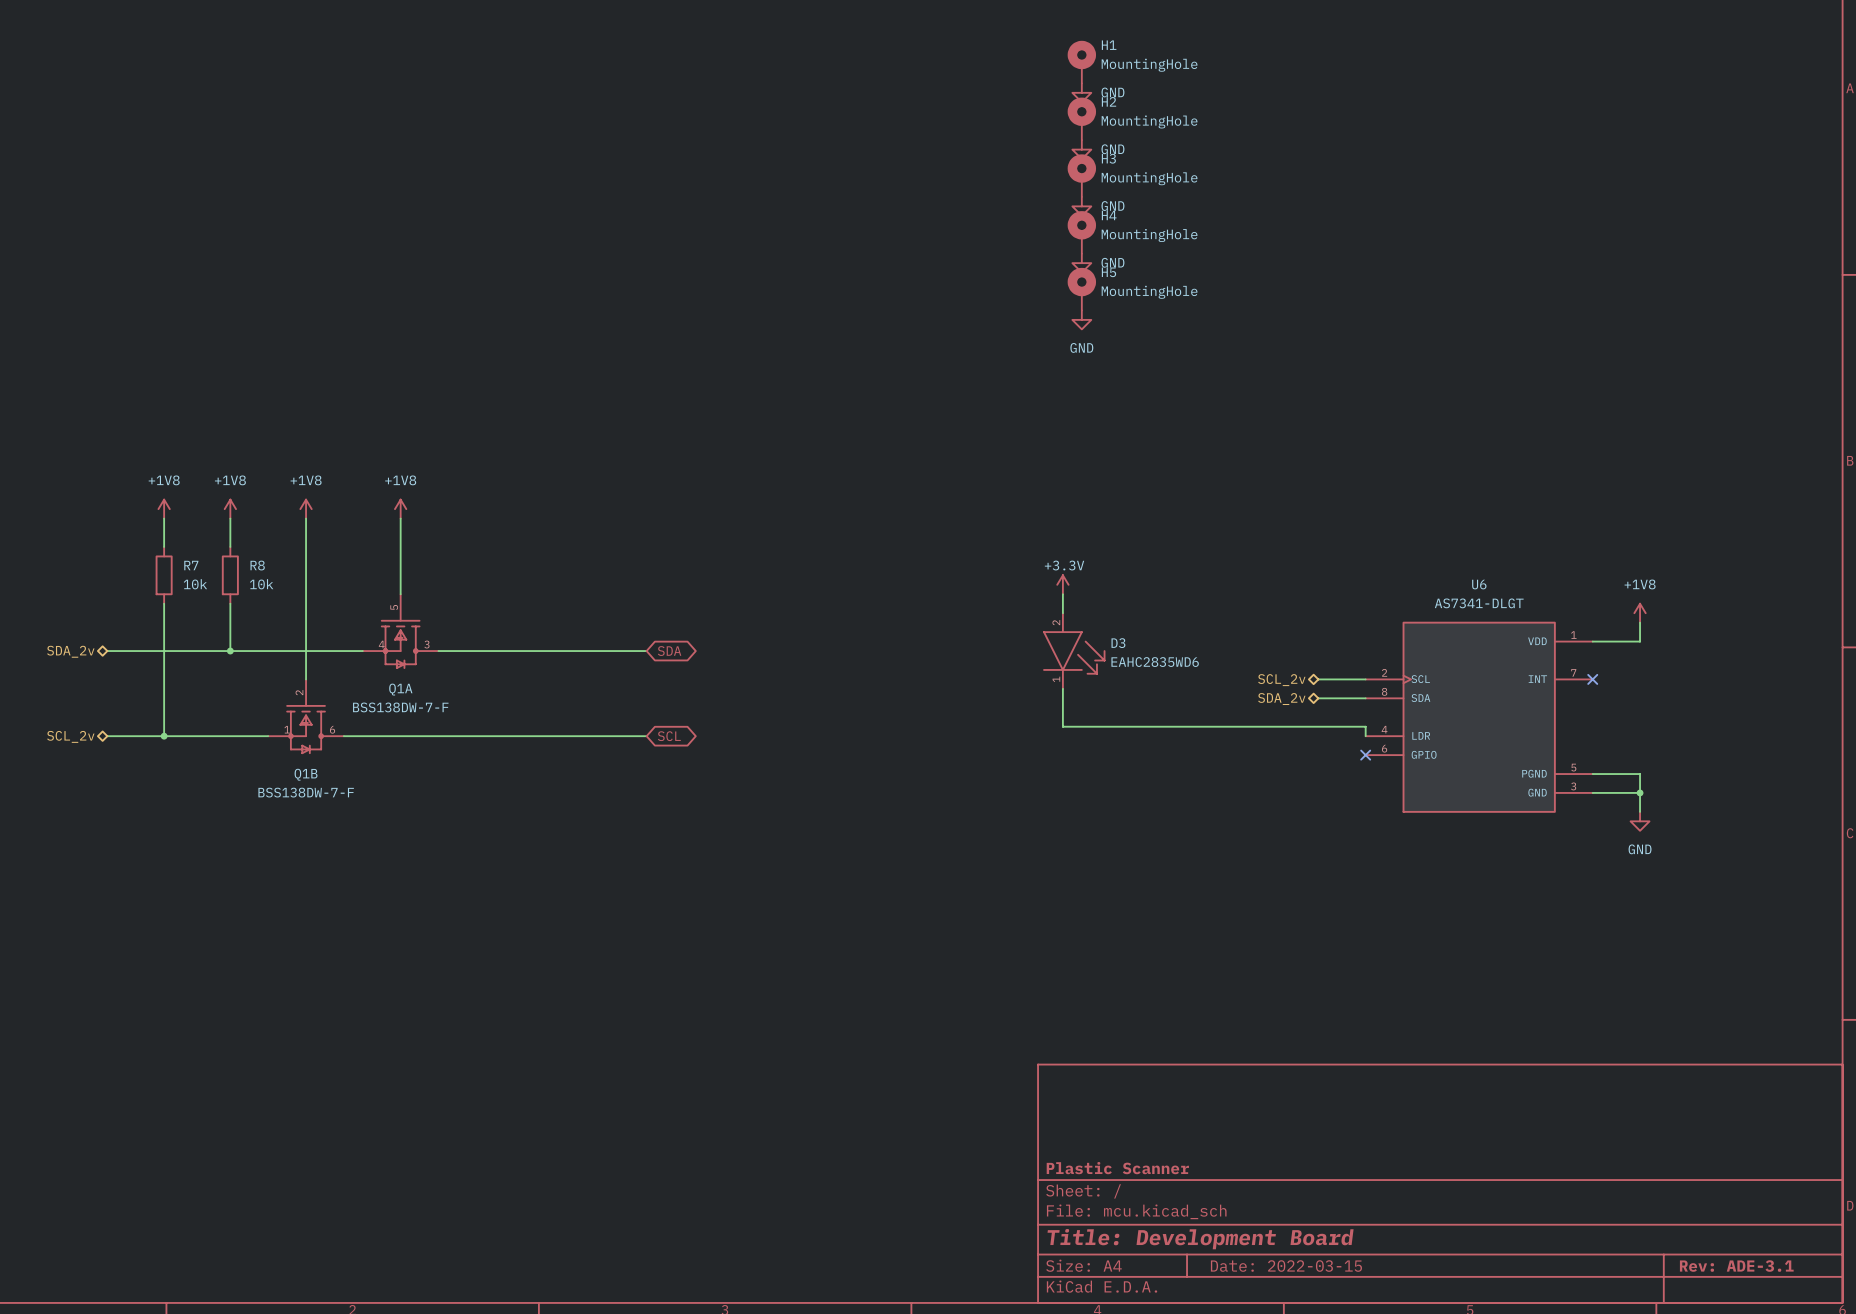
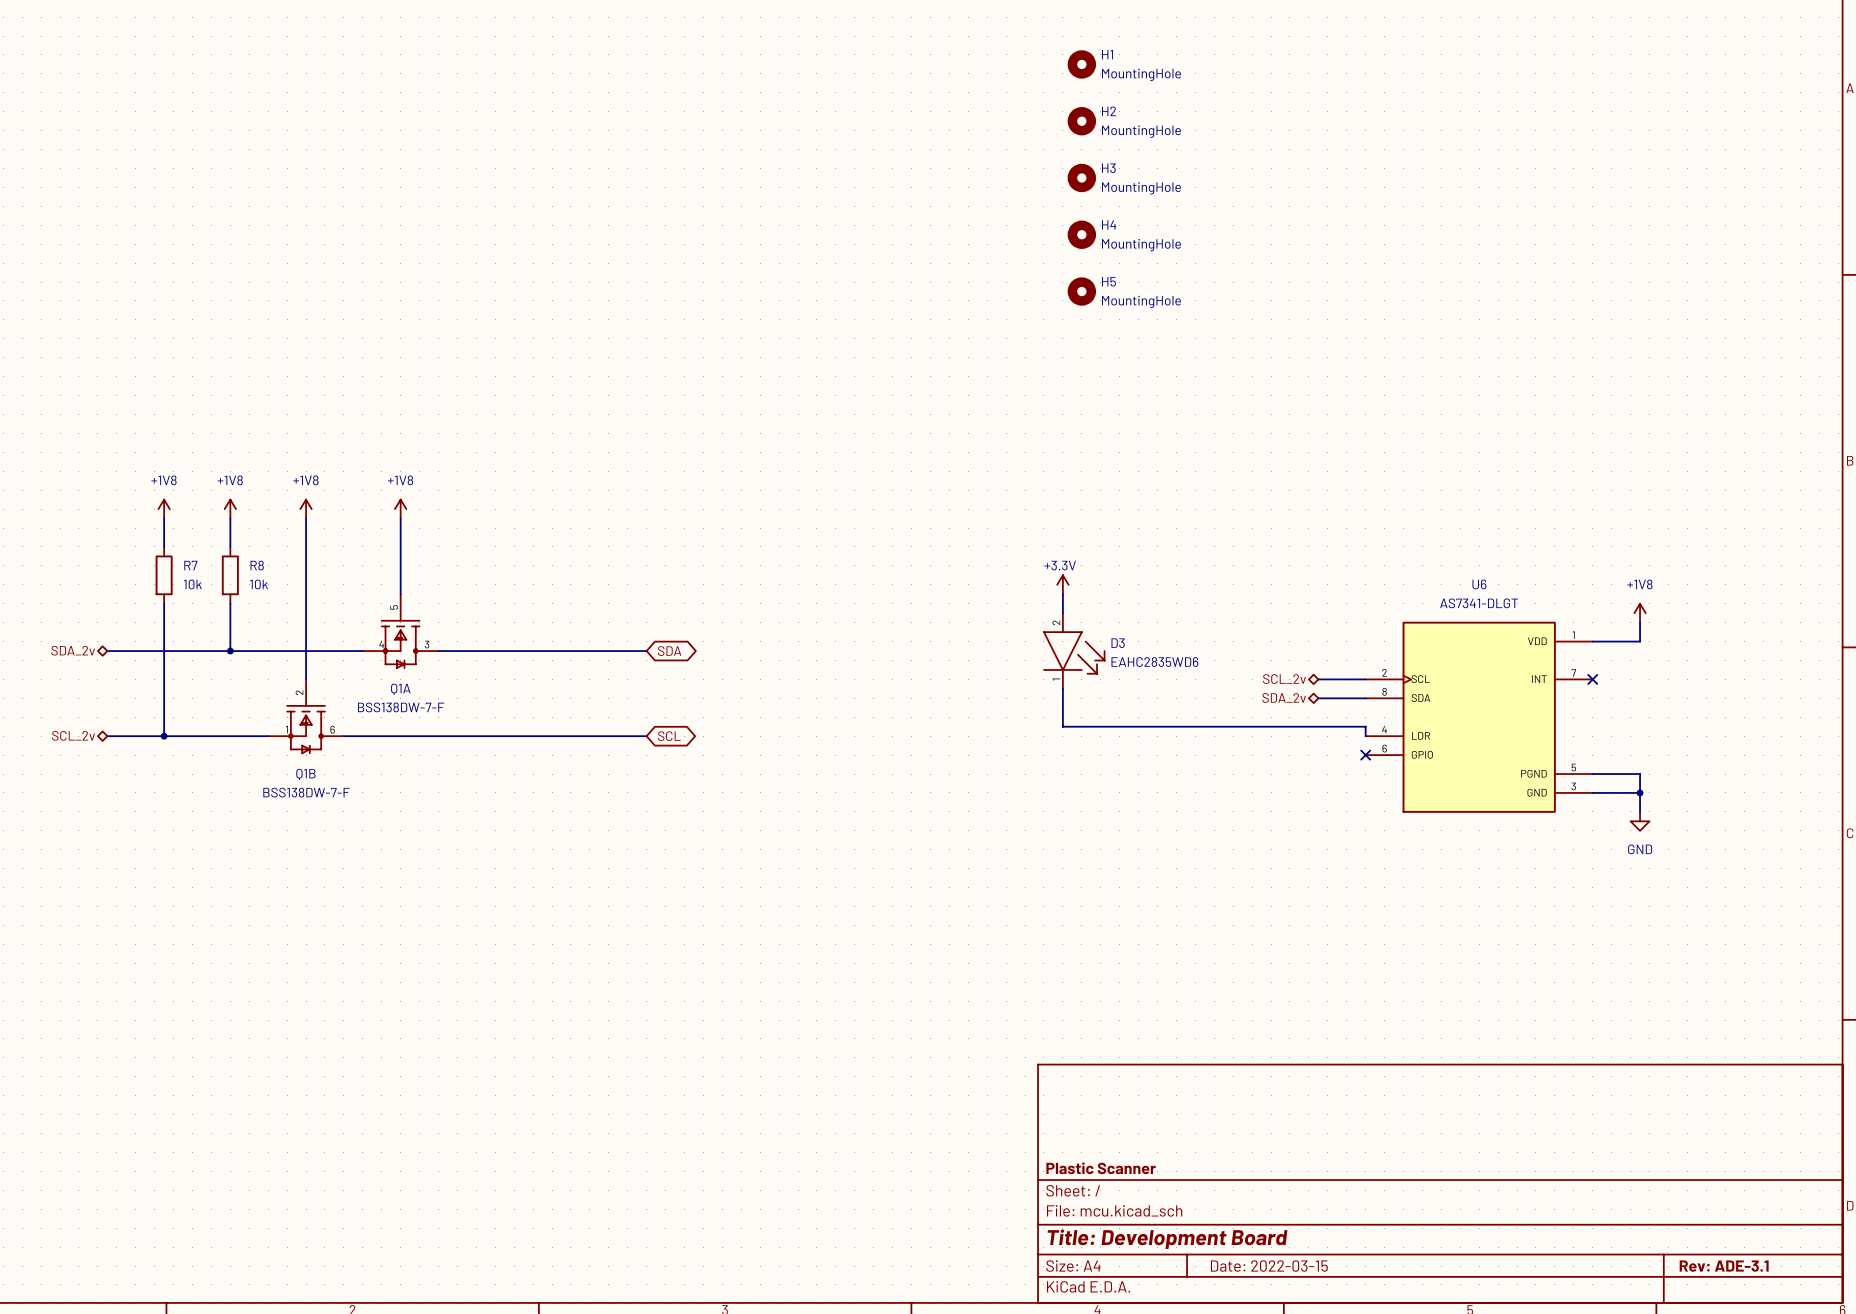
H1 symbol: [1067, 40, 1097, 84] -> [1067, 50, 1097, 79]
power symbol: GND (1081, 92) -> none
H2 symbol: [1067, 97, 1097, 141] -> [1067, 107, 1097, 136]
power symbol: GND (1081, 149) -> none
H3 symbol: [1067, 154, 1097, 197] -> [1067, 163, 1097, 193]
power symbol: GND (1081, 206) -> none
H4 symbol: [1067, 211, 1097, 254] -> [1067, 220, 1097, 249]
power symbol: GND (1081, 263) -> none
H5 symbol: [1067, 267, 1097, 311] -> [1067, 277, 1097, 306]
power symbol: GND (1081, 319) -> none

